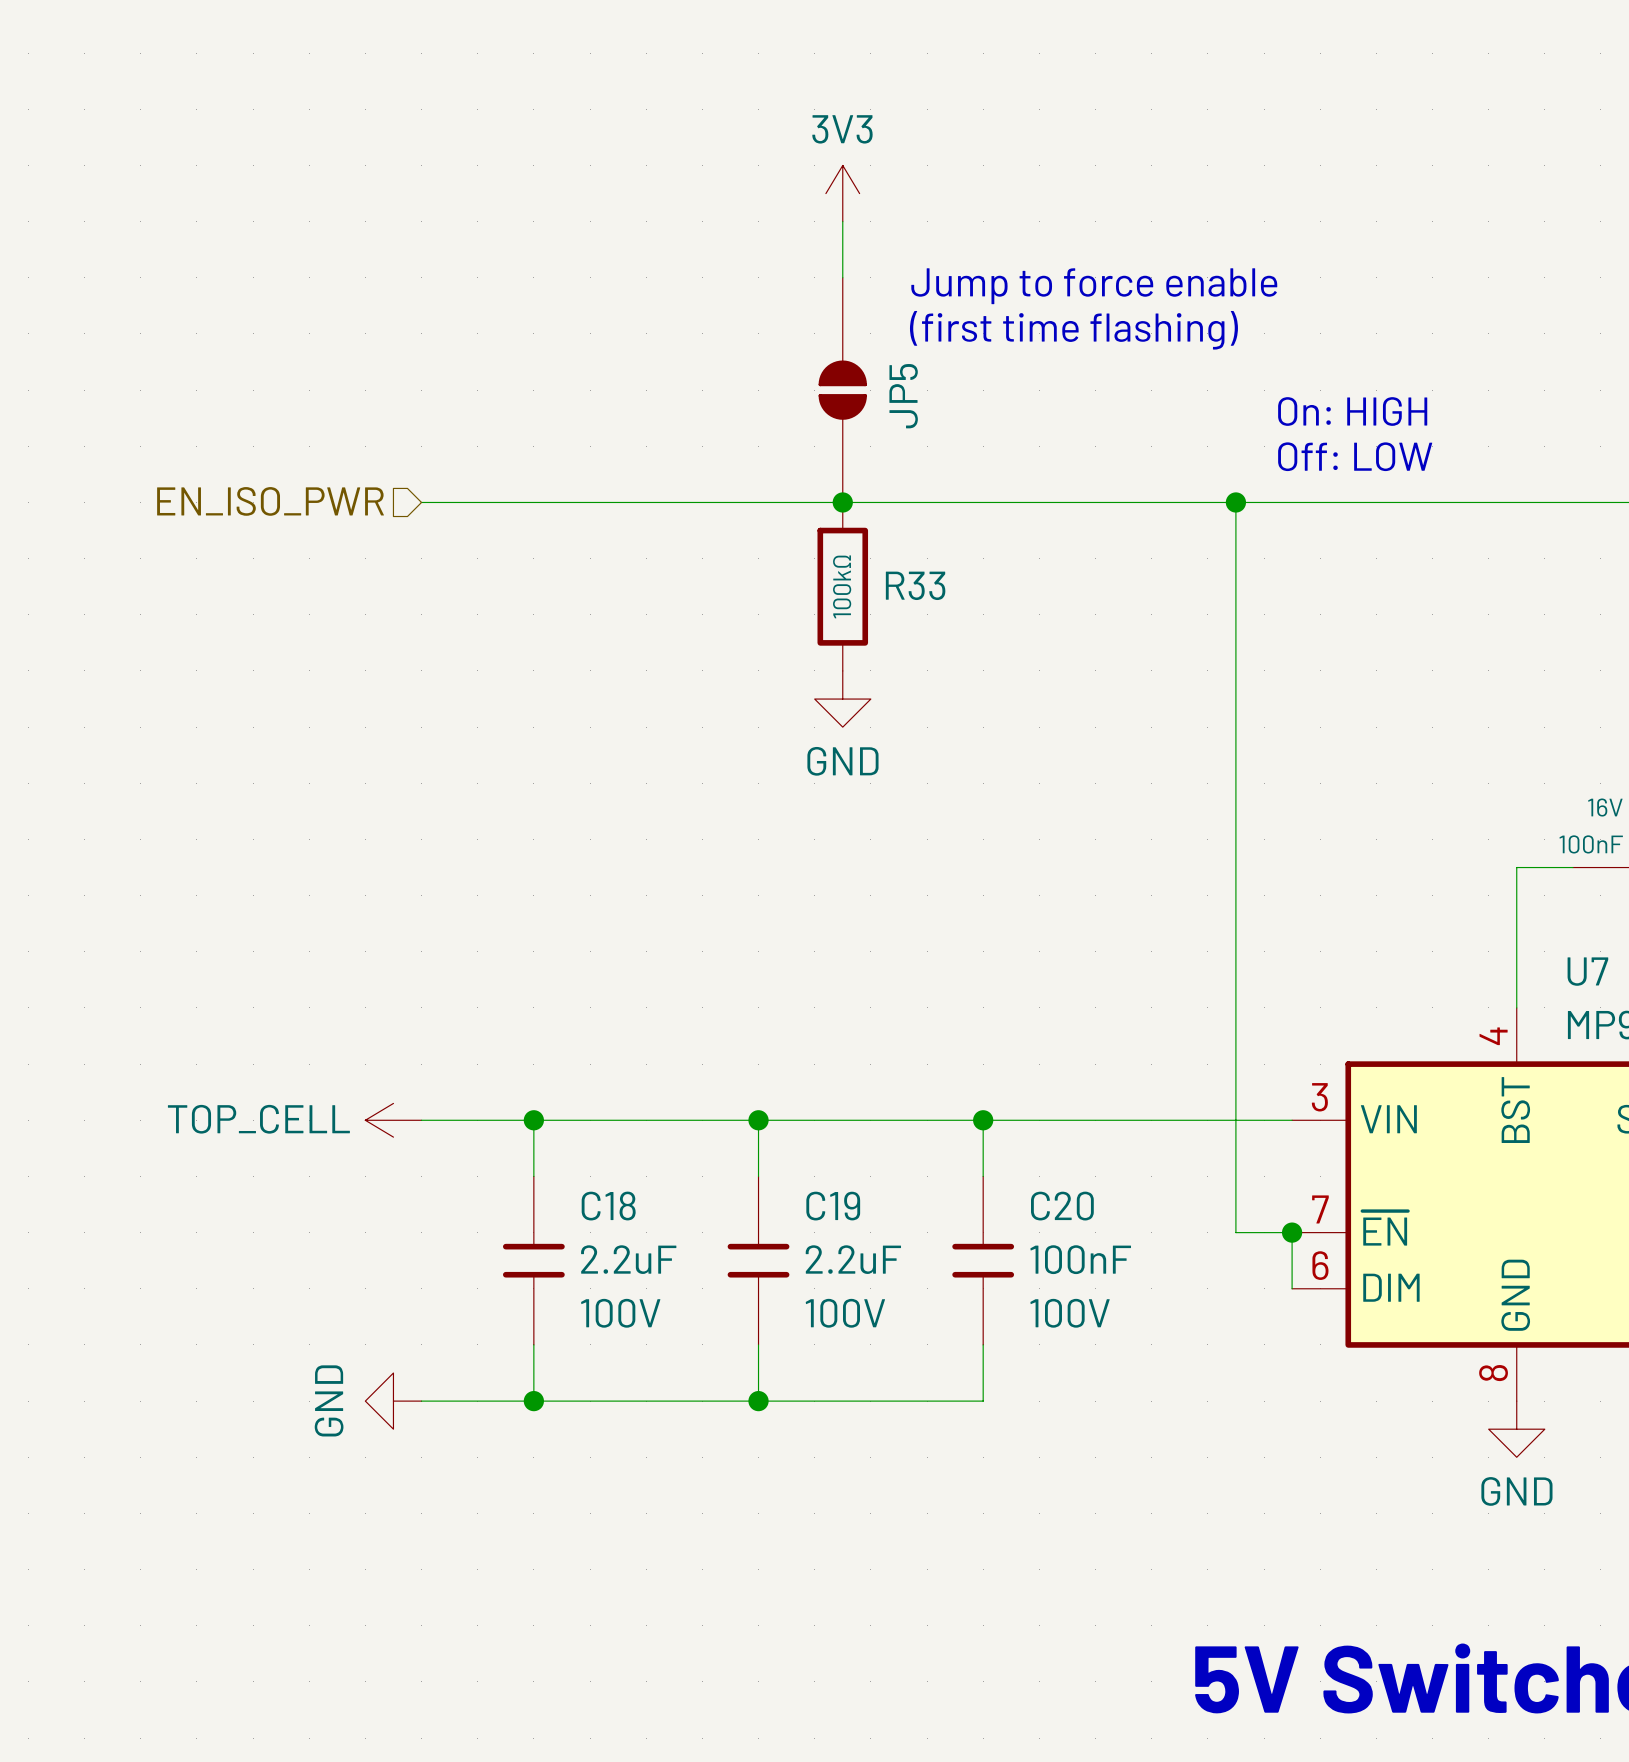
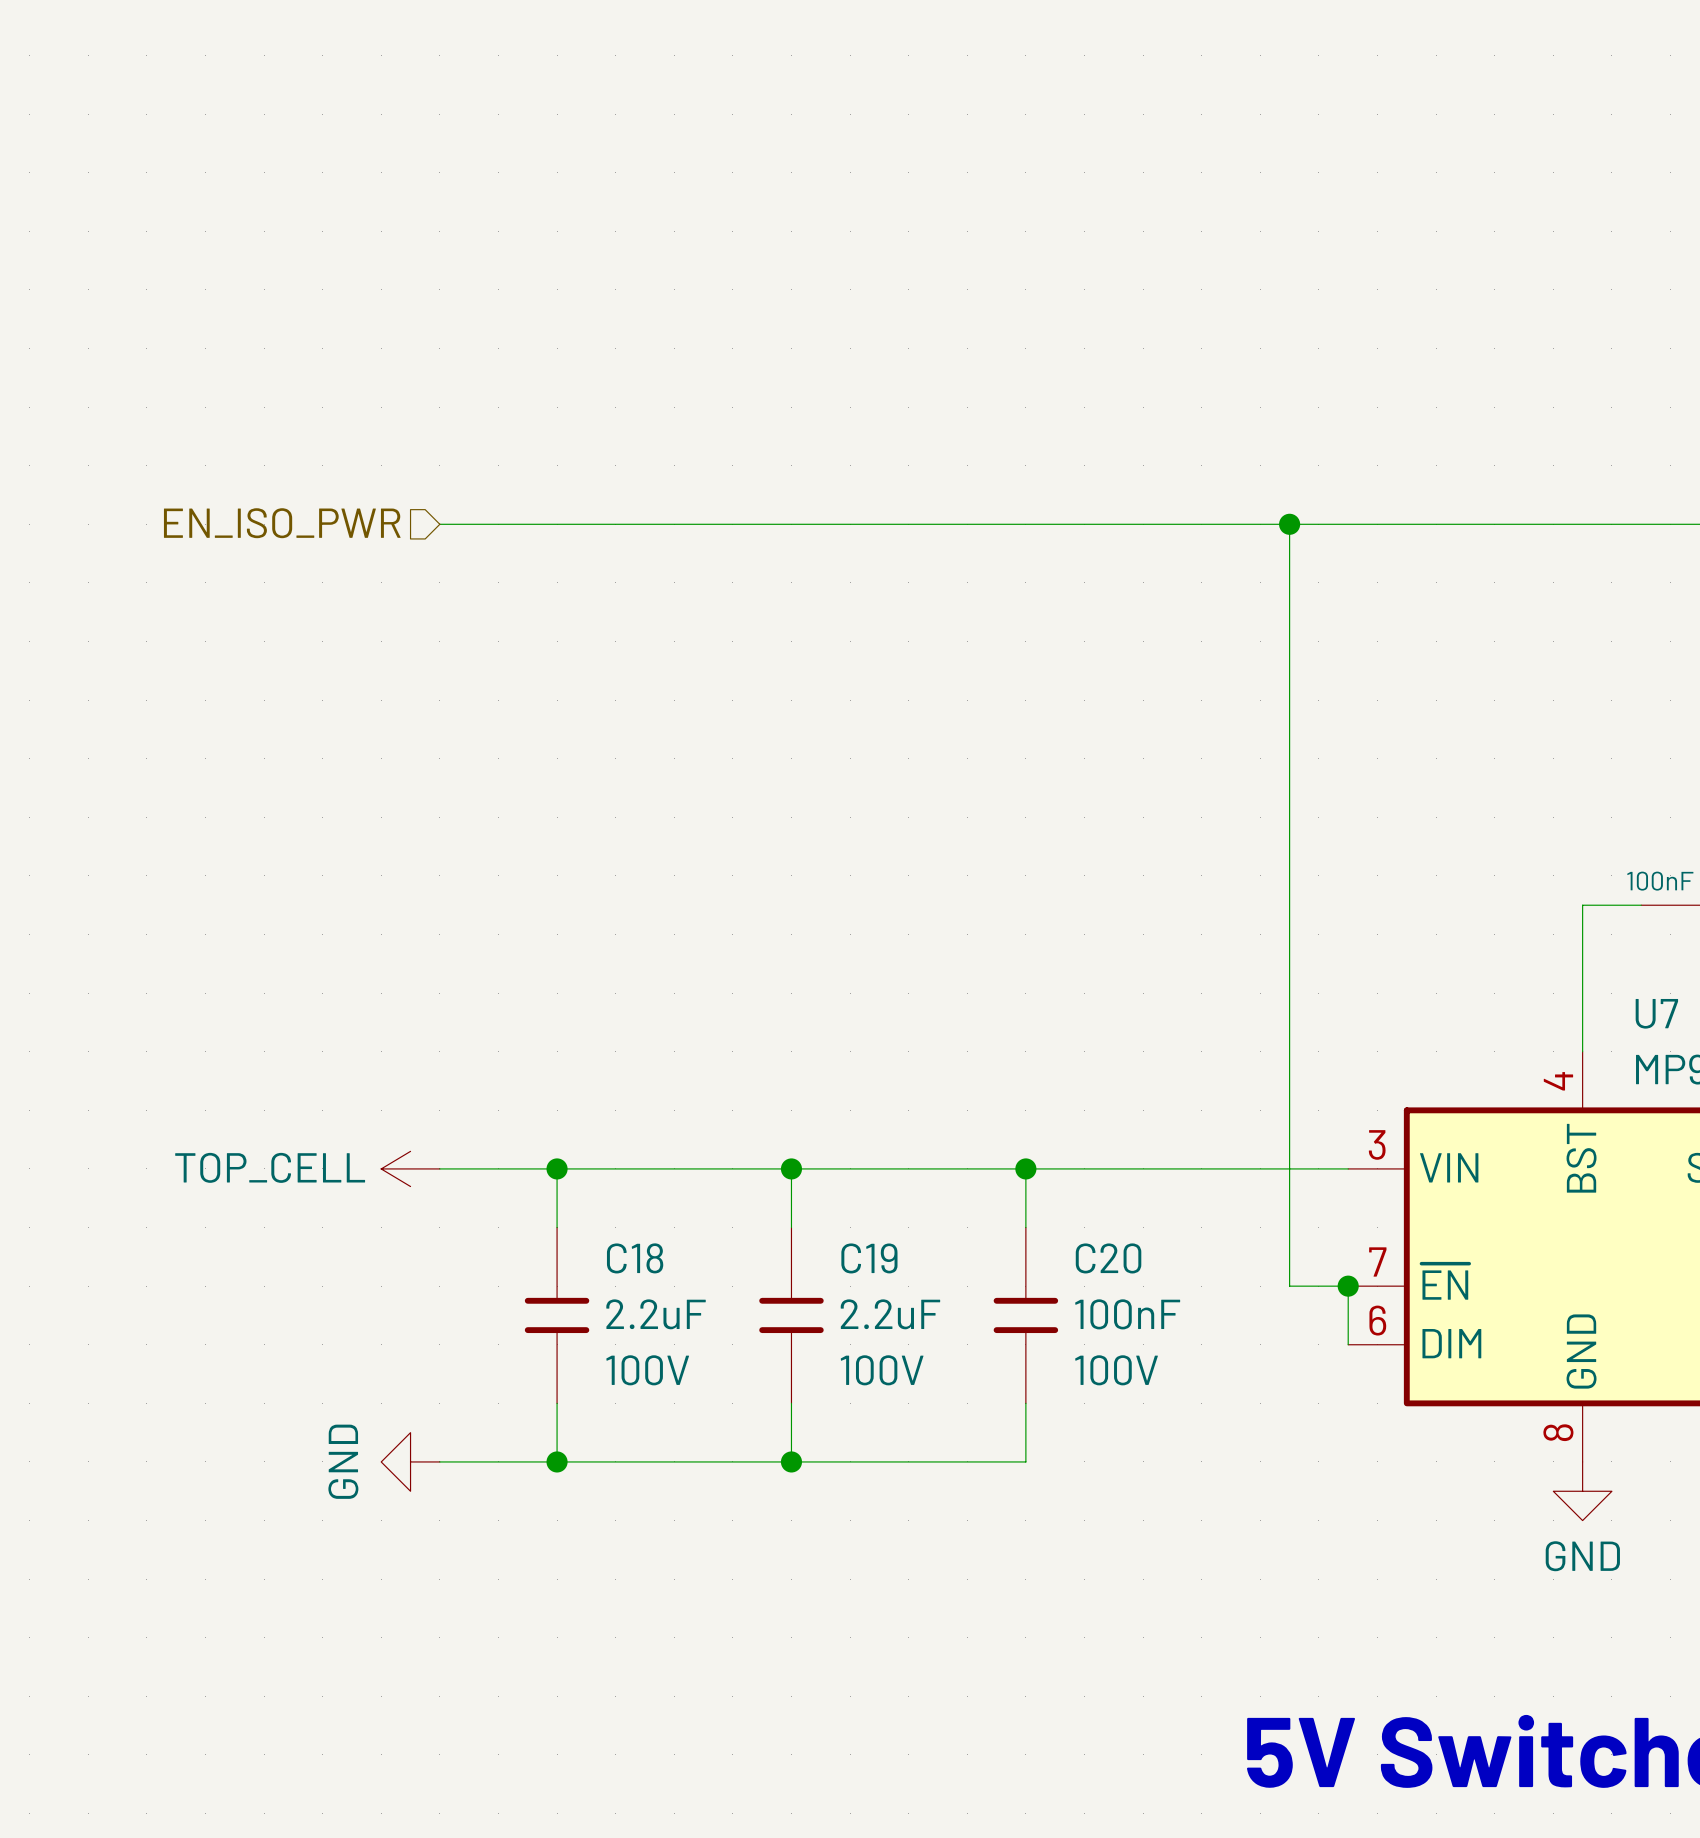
power symbol: 3V3 (842, 193) -> none
wire: (842, 221) (842, 277) -> none
text: Jump to force enable (1094, 286) -> none
text: (first time flashing) (1073, 330) -> none
JP5: (842, 390) -> none
text: On: HIGH (1352, 411) -> none
text: Off: LOW (1355, 456) -> none
junction: (842, 502) -> none
R33: 100kΩ (842, 586) -> none
power symbol: GND (842, 699) -> none
part text: 16V (1605, 807) -> none

